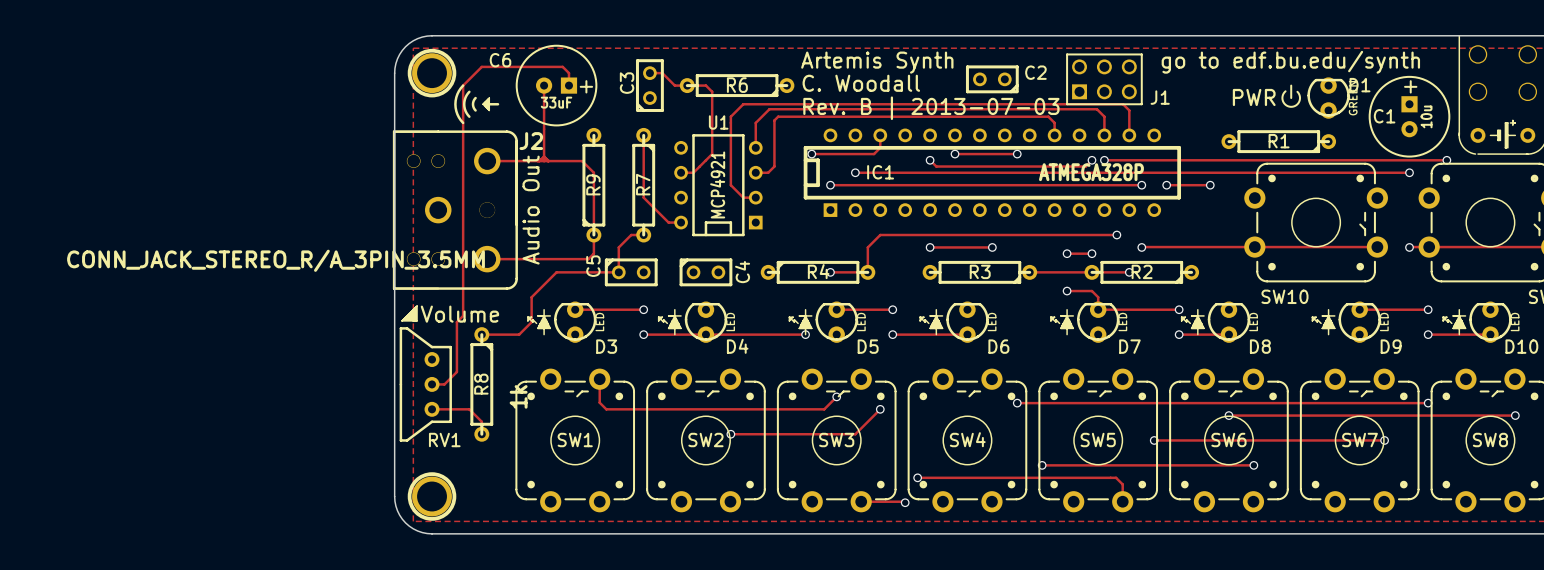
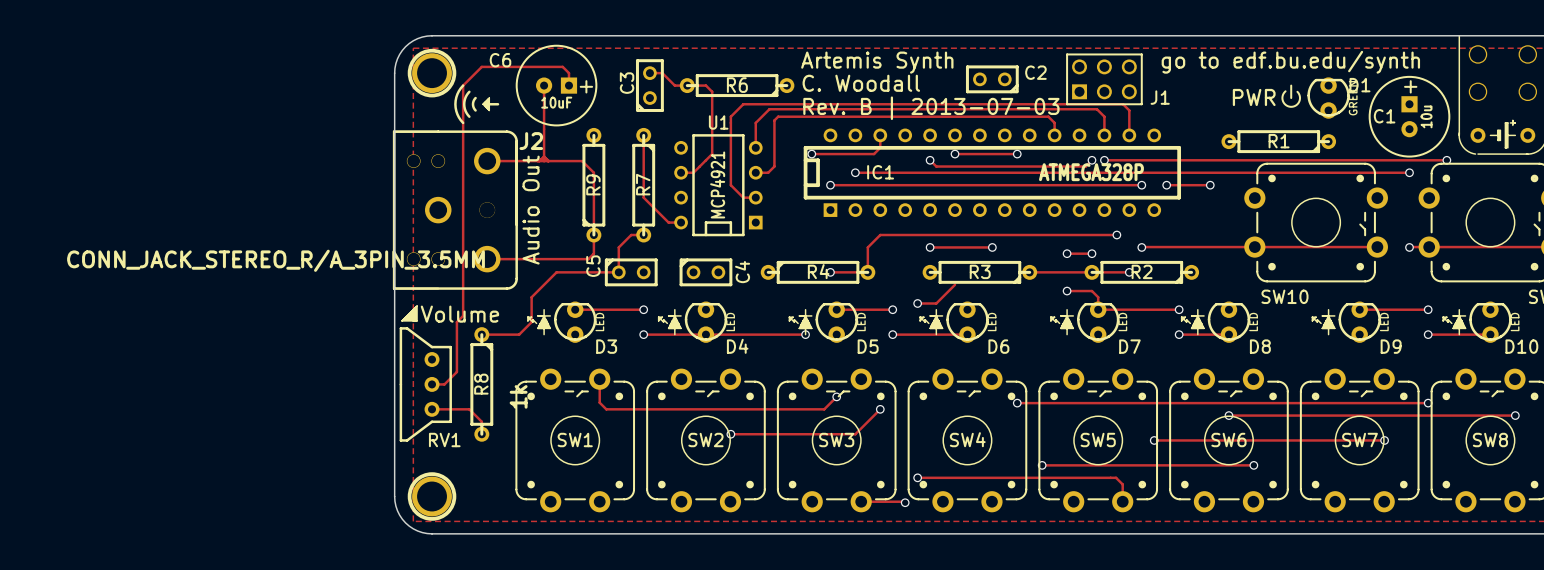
C6 value: 33uF (556, 102) -> 10uF (556, 102)
track: none -> (955, 284) (936, 303) (917, 303)
via: none -> (917, 303)

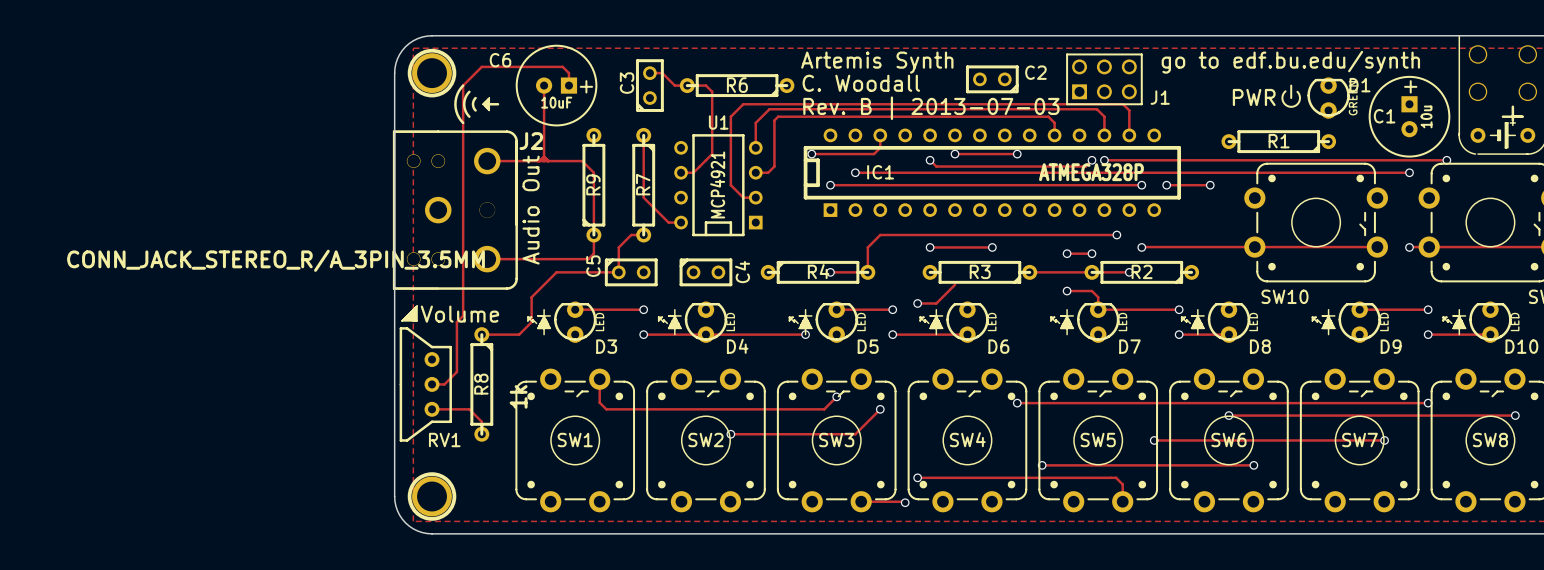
line: none -> (1502, 116) (1522, 116)
line: none -> (1512, 116) (1512, 106) (1512, 120)

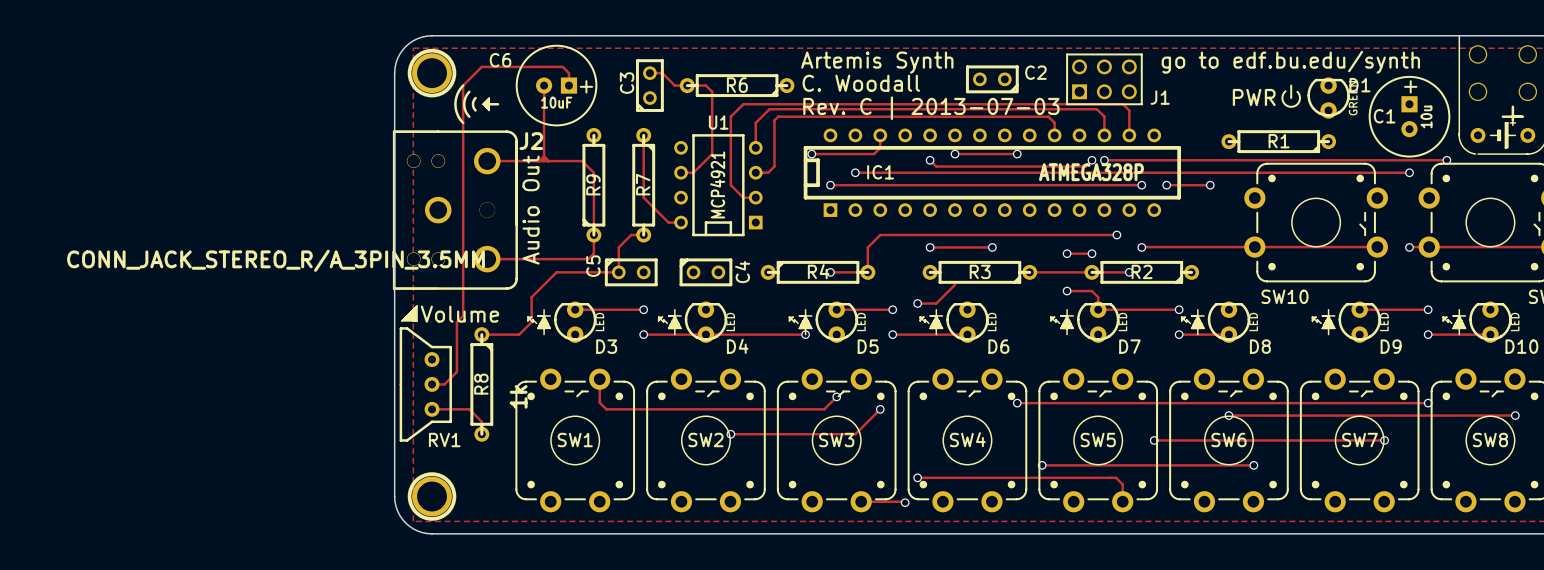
text: Rev. B | 2013-07-03 (931, 108) -> Rev. C | 2013-07-03 (931, 108)

